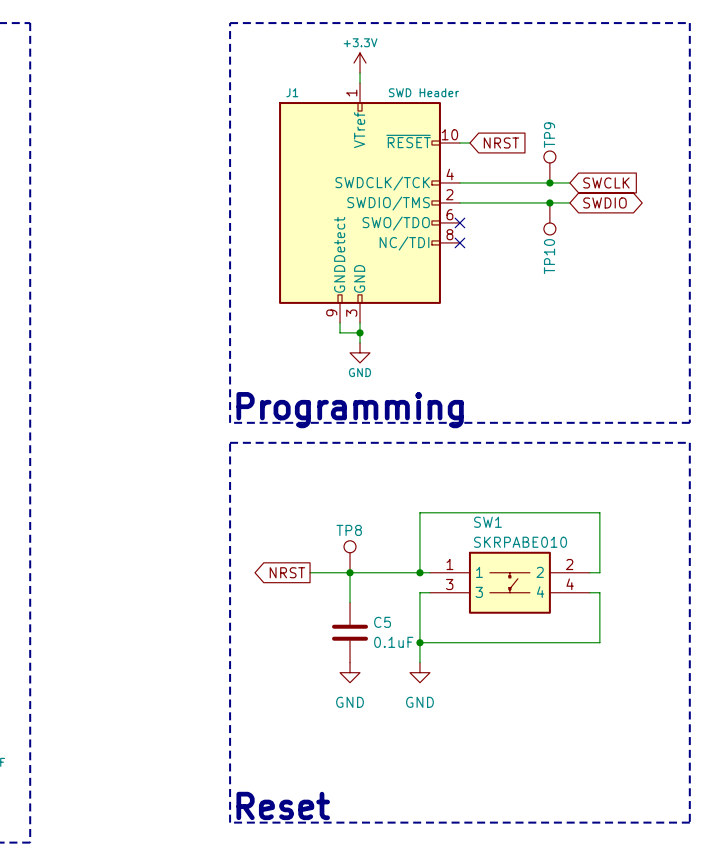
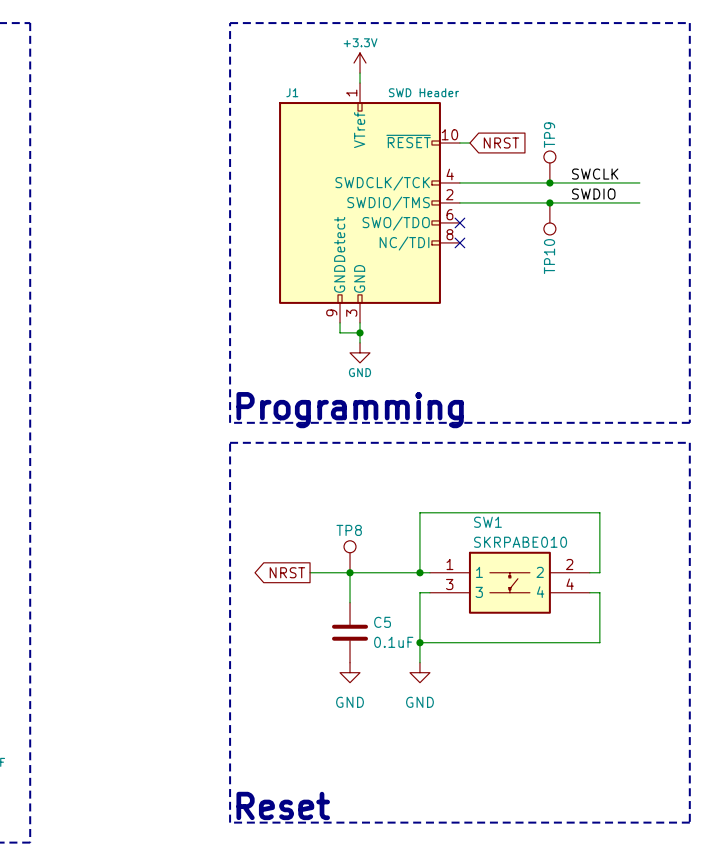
label: none -> SWCLK (595, 174)
wire: none -> (569, 182) (639, 182)
global label: SWCLK (606, 182) -> none
label: none -> SWDIO (593, 194)
wire: none -> (569, 202) (639, 202)
global label: SWDIO (605, 202) -> none

